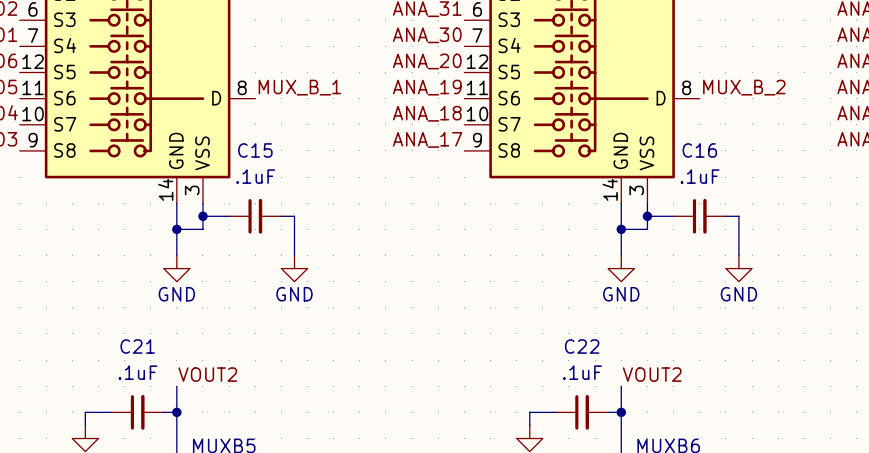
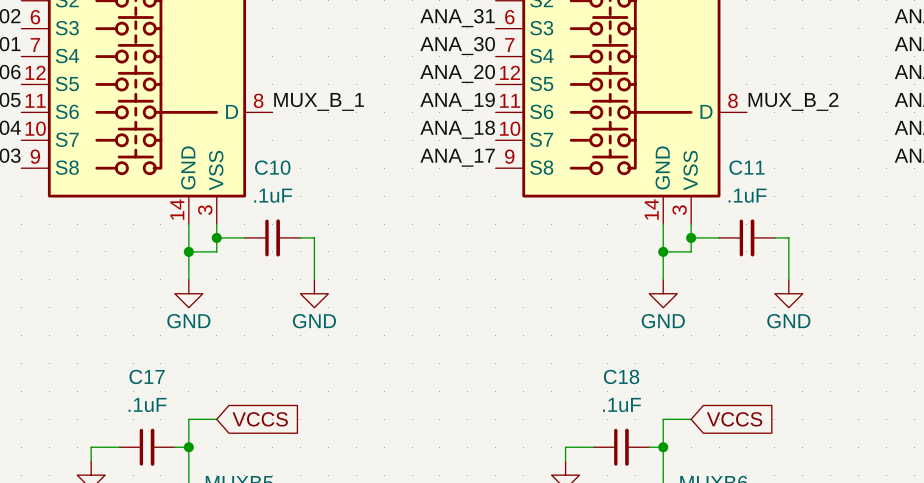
C15 name: C15 (255, 150) -> C10 (272, 167)
C16 name: C16 (699, 150) -> C11 (747, 167)
C21 name: C21 (137, 346) -> C17 (147, 376)
C22 name: C22 (582, 346) -> C18 (621, 376)
label: VOUT2 (207, 374) -> none
label: VOUT2 (652, 374) -> none
wire: none -> (188, 419) (216, 419)
global label: none -> VCCS (260, 419)
wire: none -> (663, 419) (691, 419)
global label: none -> VCCS (734, 419)

